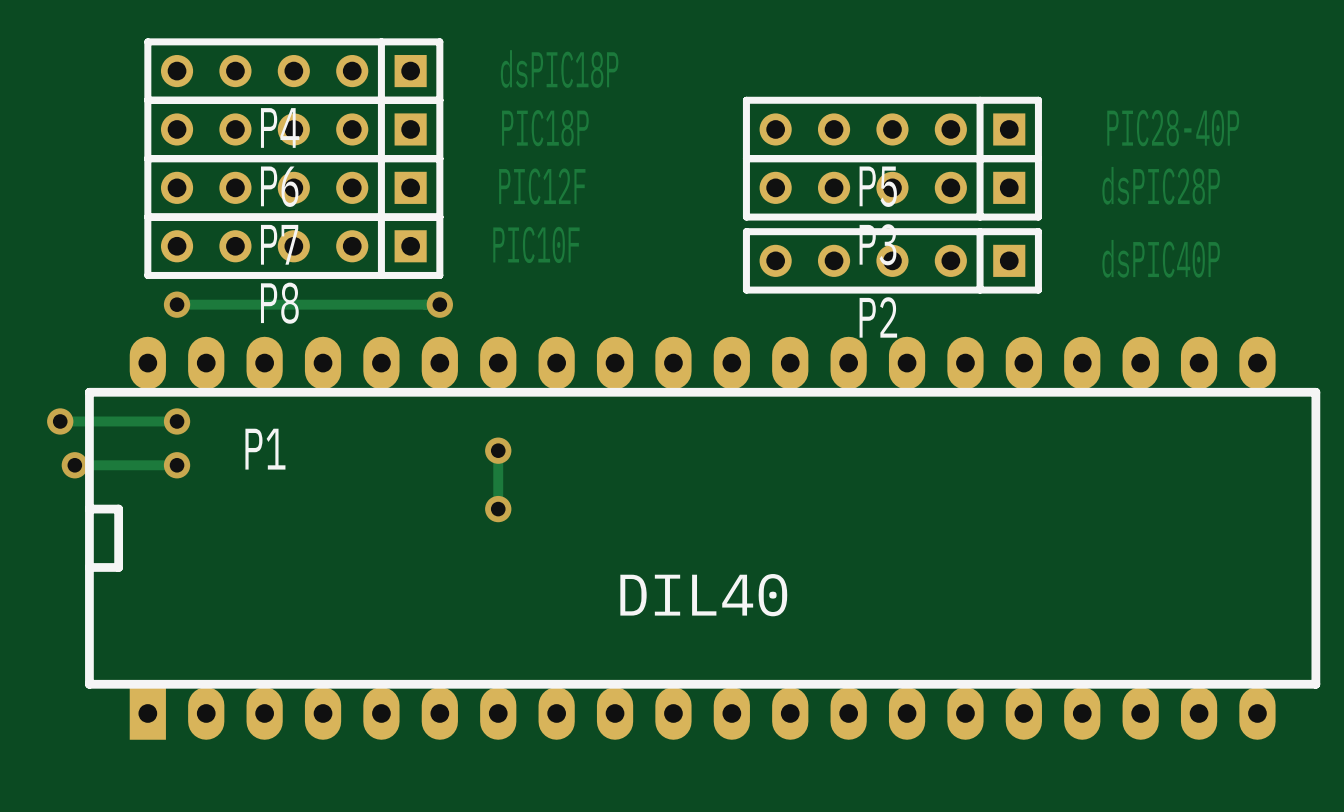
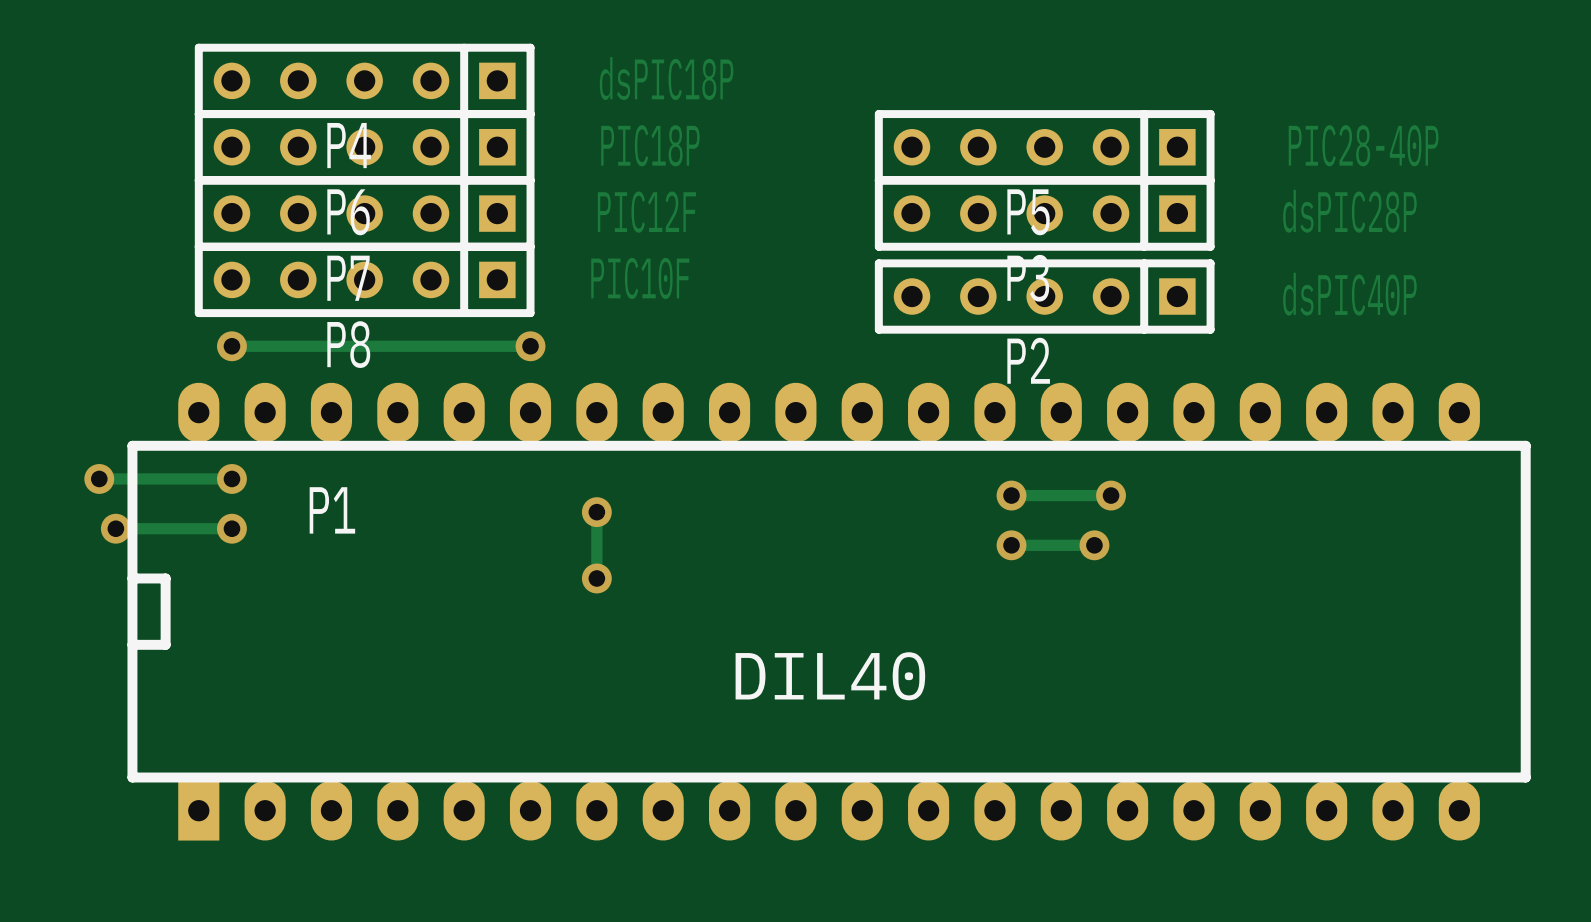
track: none -> (1011, 495) (1111, 495)
via: none -> (1011, 495)
via: none -> (1111, 495)
track: none -> (1011, 545) (1094, 545)
via: none -> (1011, 545)
via: none -> (1094, 545)

